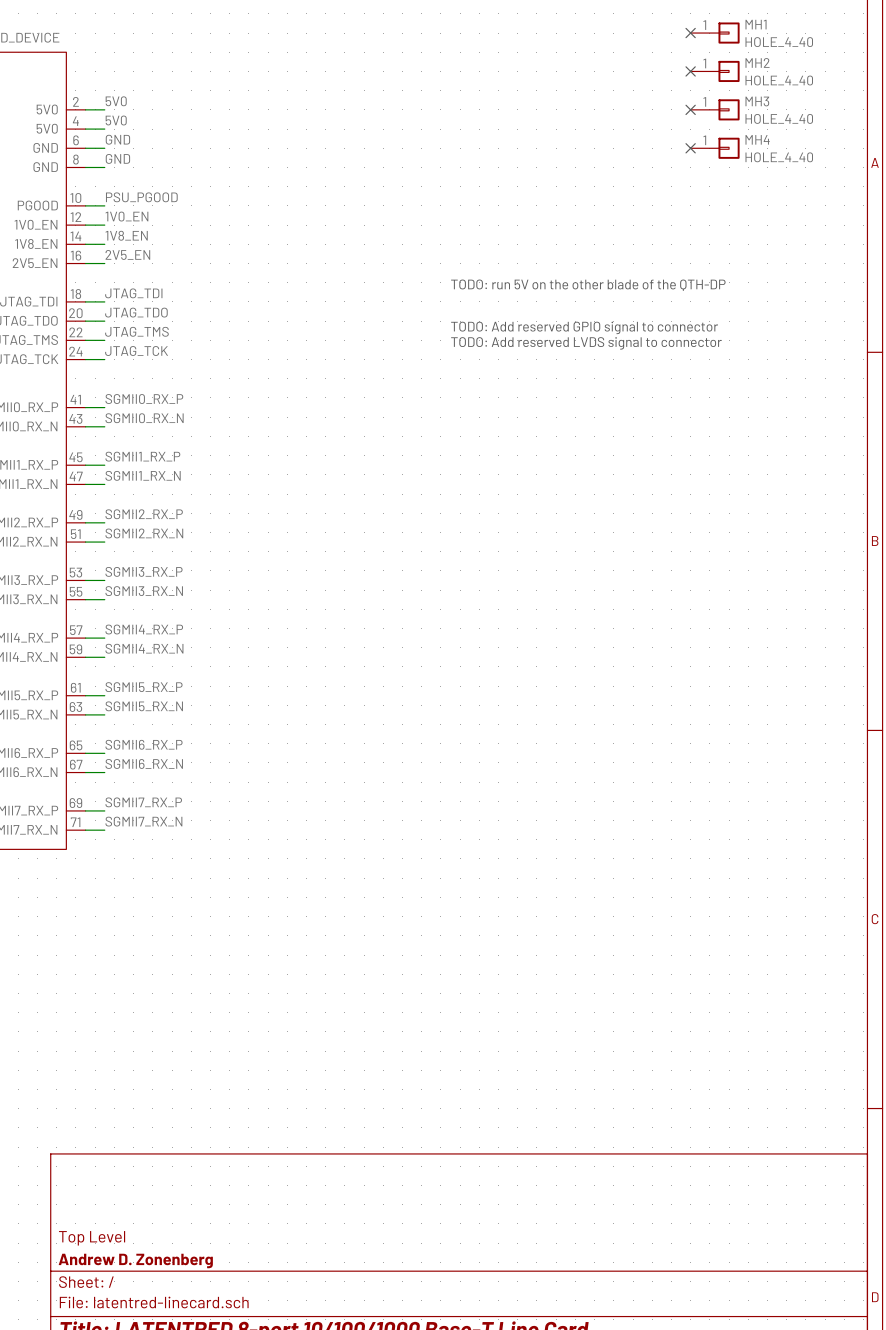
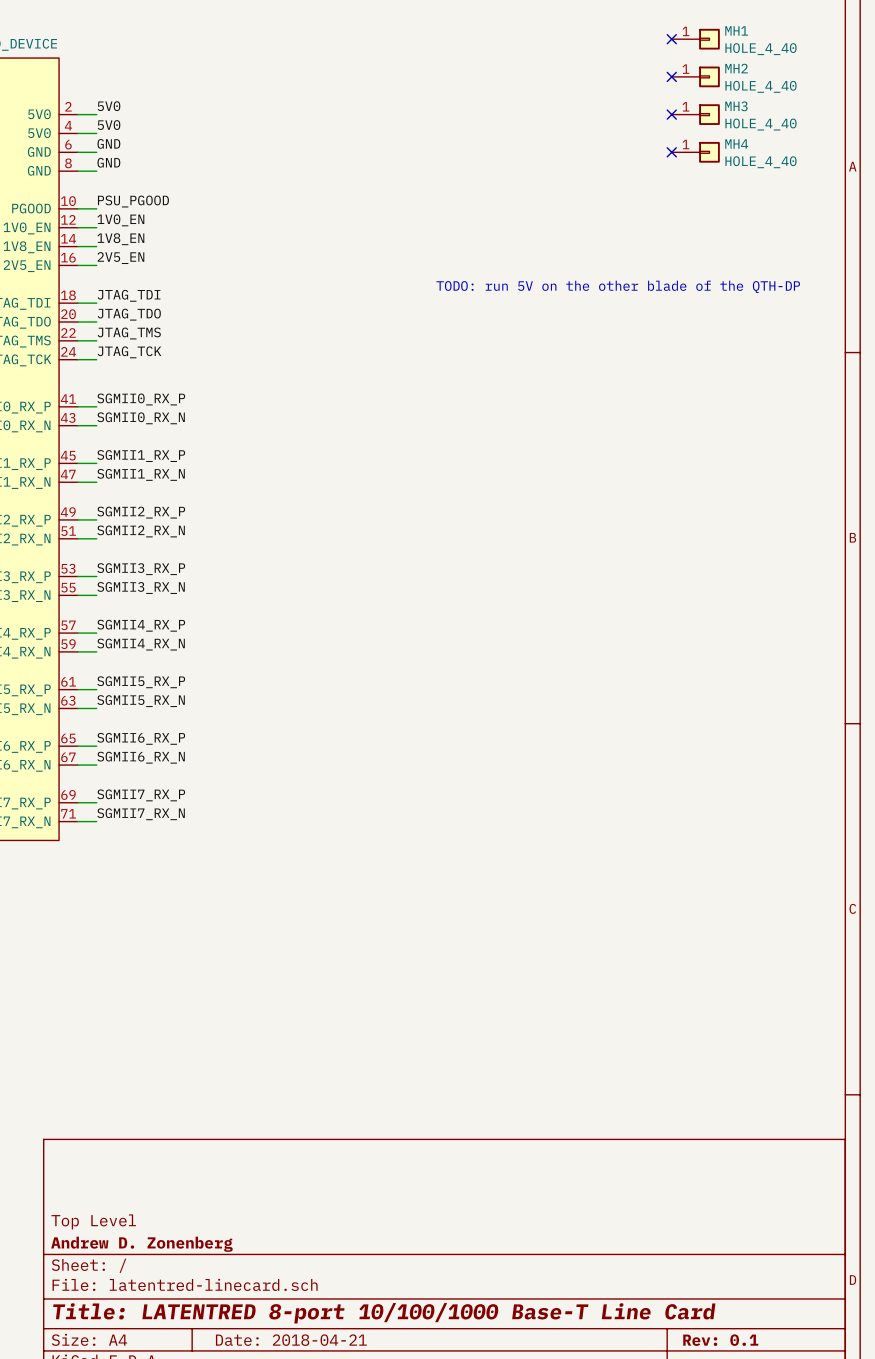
text: TODO: Add reserved GPIO signal to connector (584, 327) -> none
text: TODO: Add reserved LVDS signal to connector (586, 343) -> none

